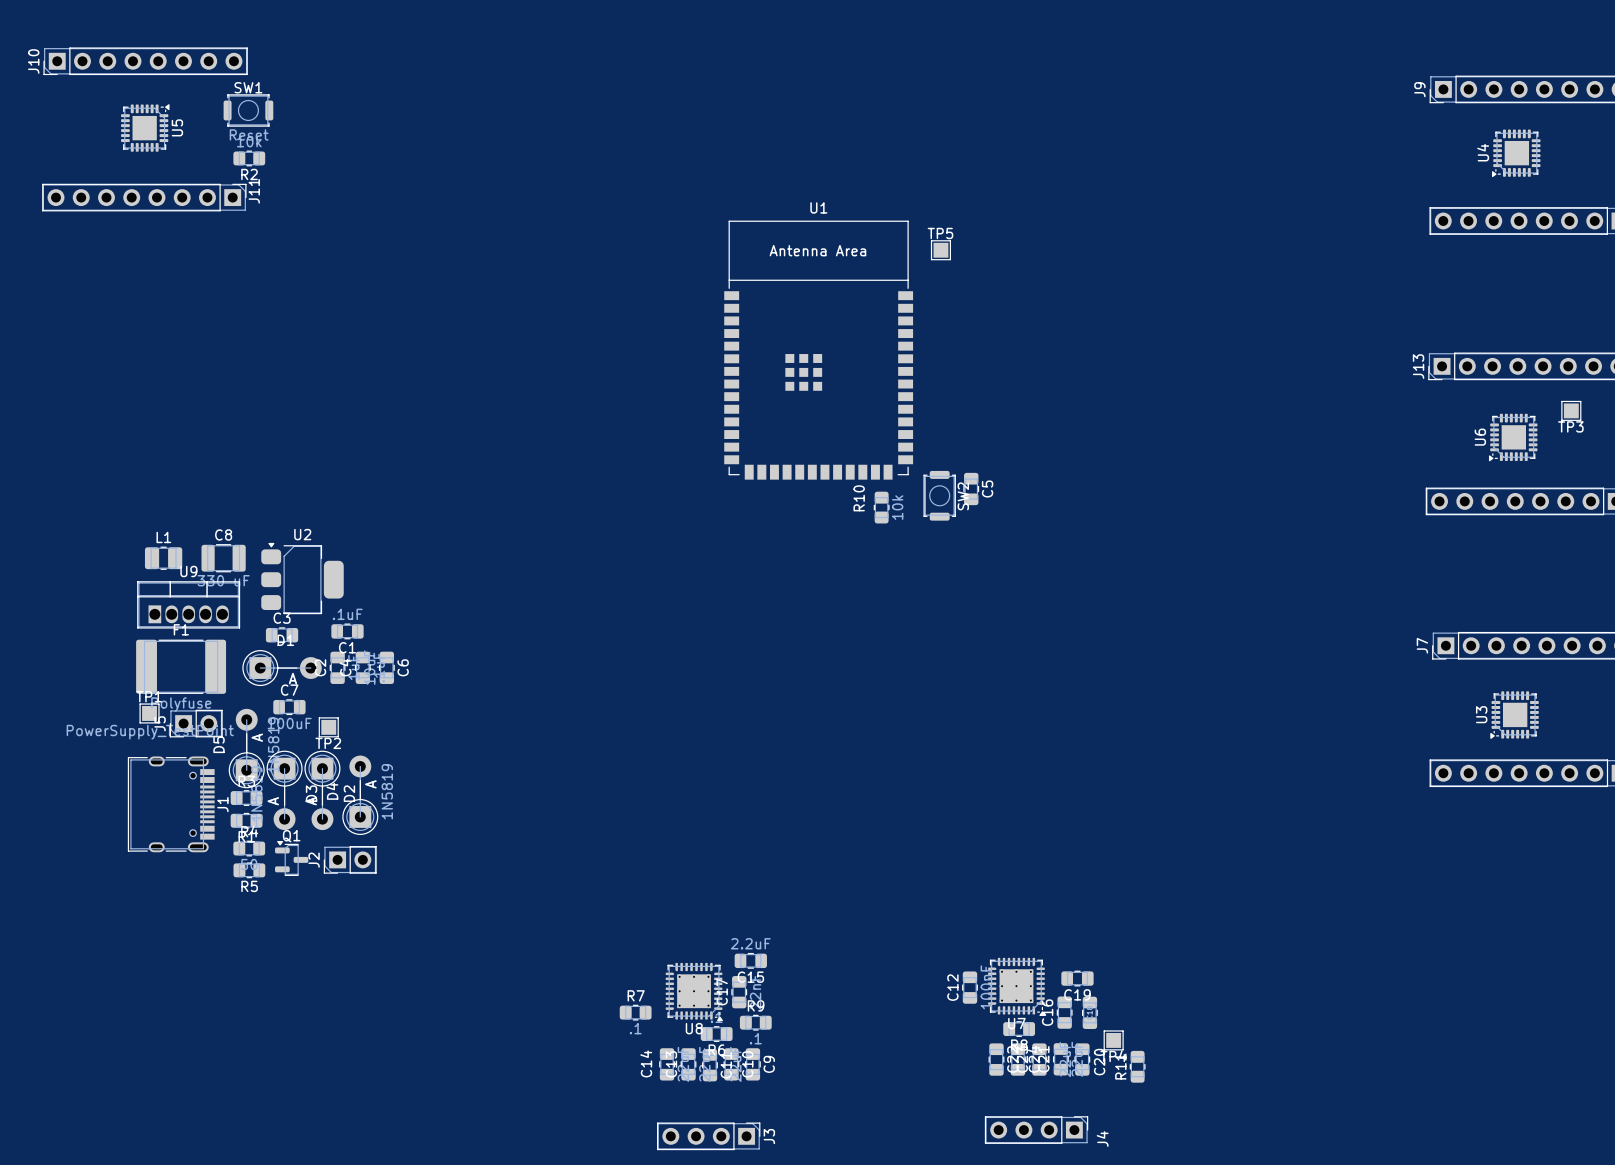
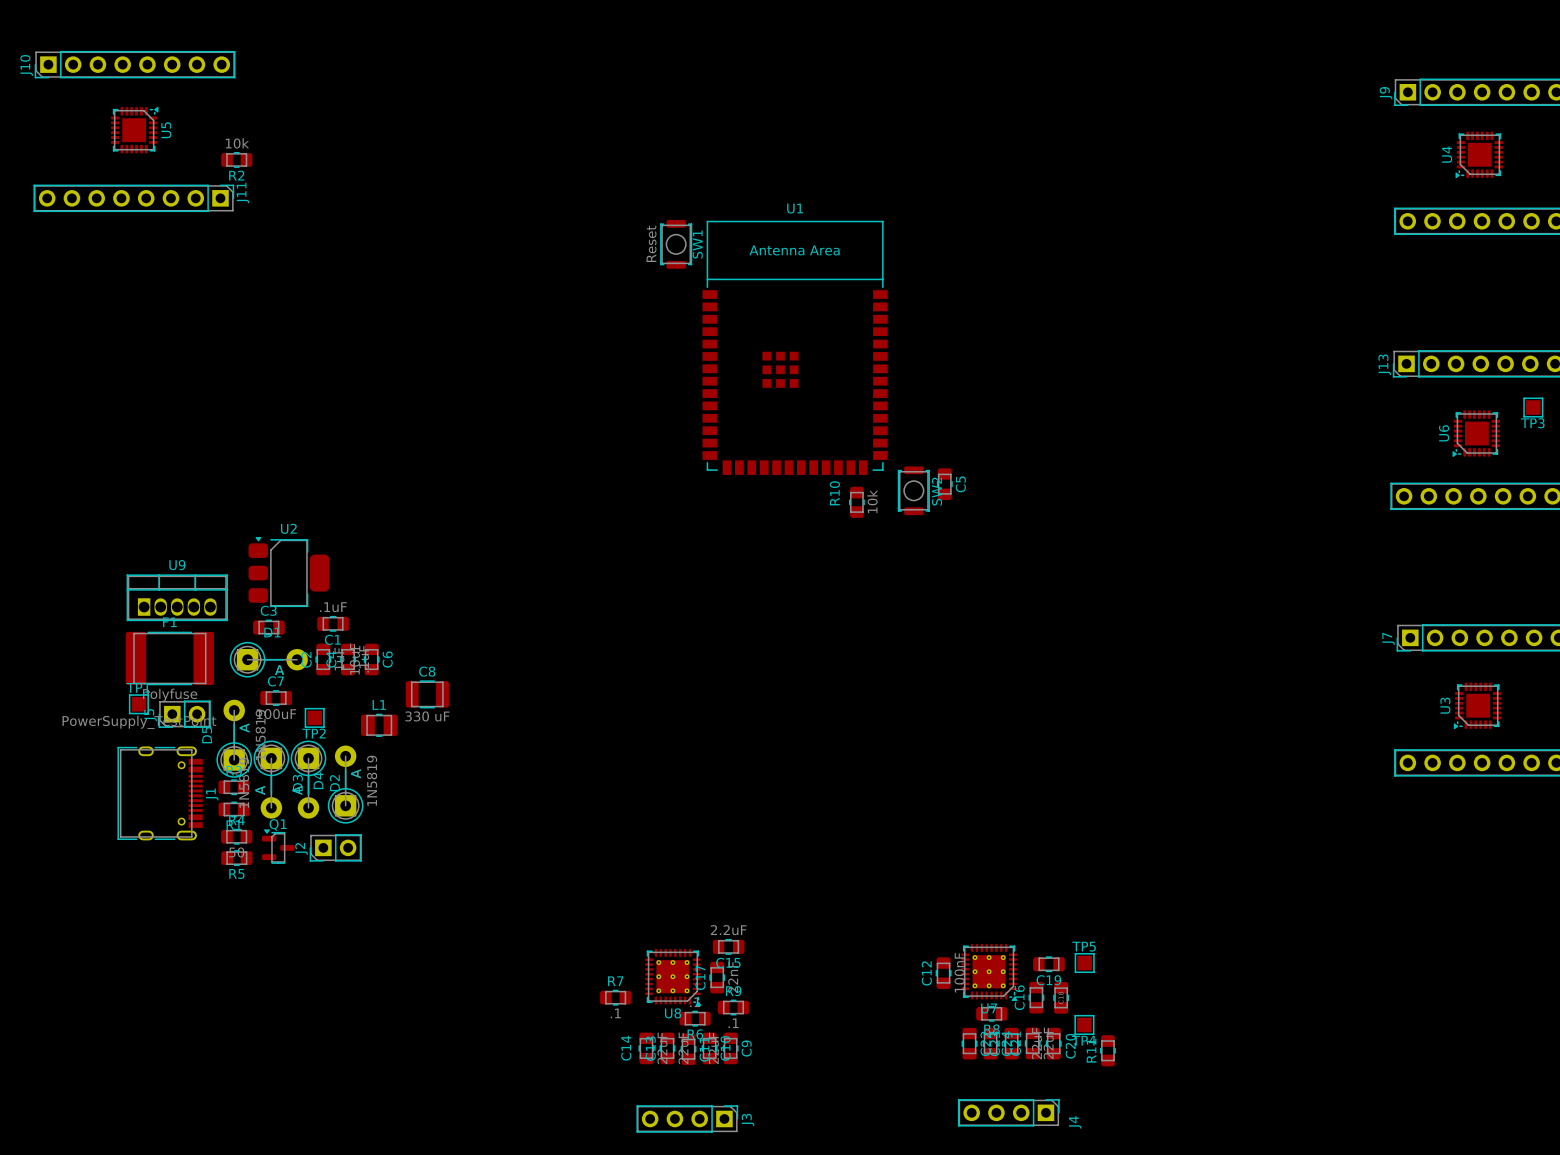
SW1 rotation: 0° (248, 110) -> 90° clockwise (676, 244)
SW1 position: (248, 110) -> (676, 244)
TP5 position: (940, 250) -> (1084, 963)
L1 position: (163, 558) -> (379, 725)
C8 position: (223, 558) -> (427, 694)

